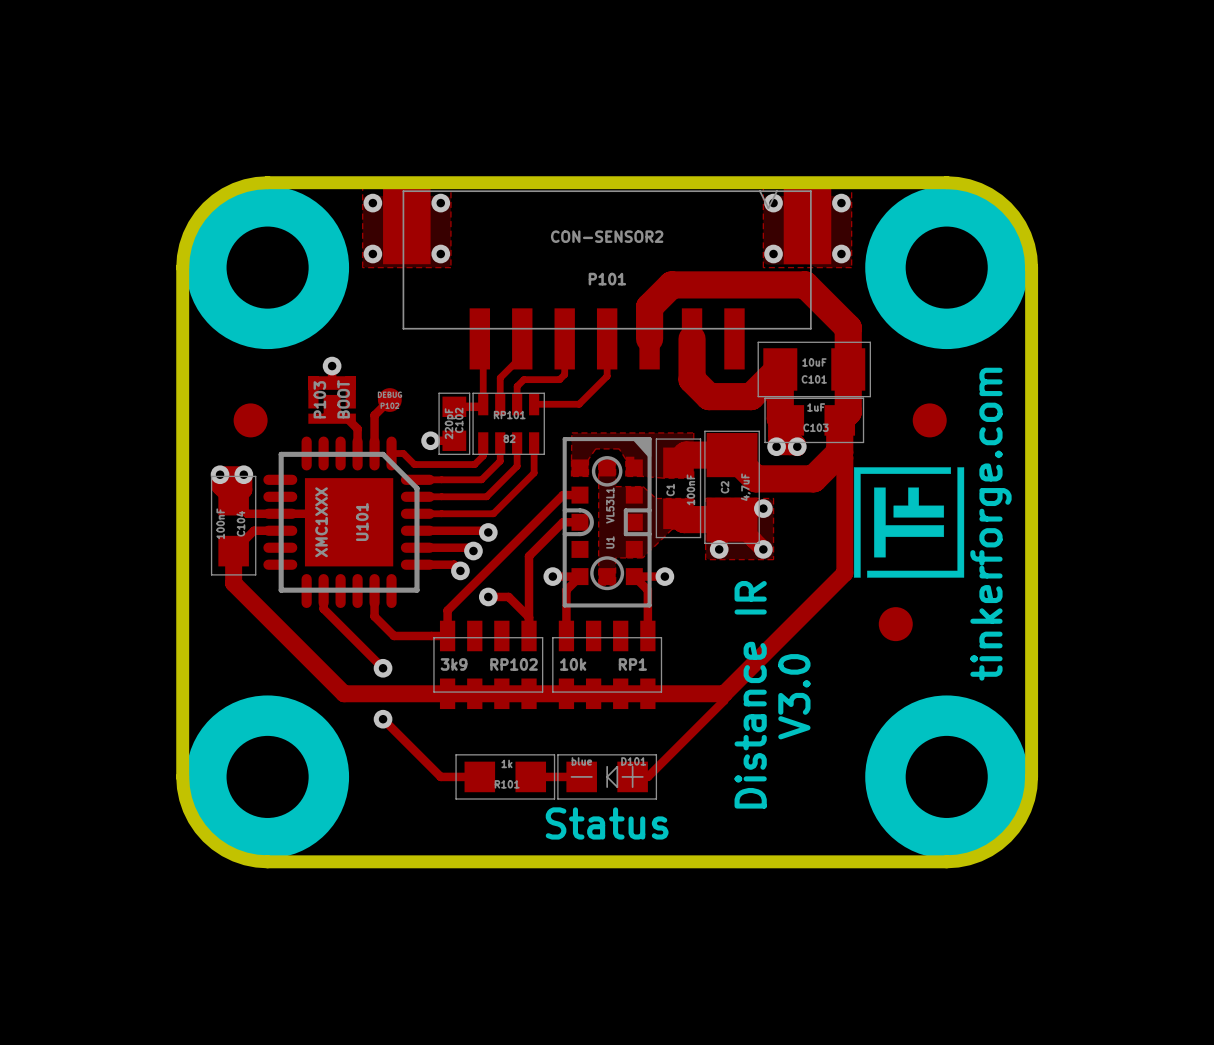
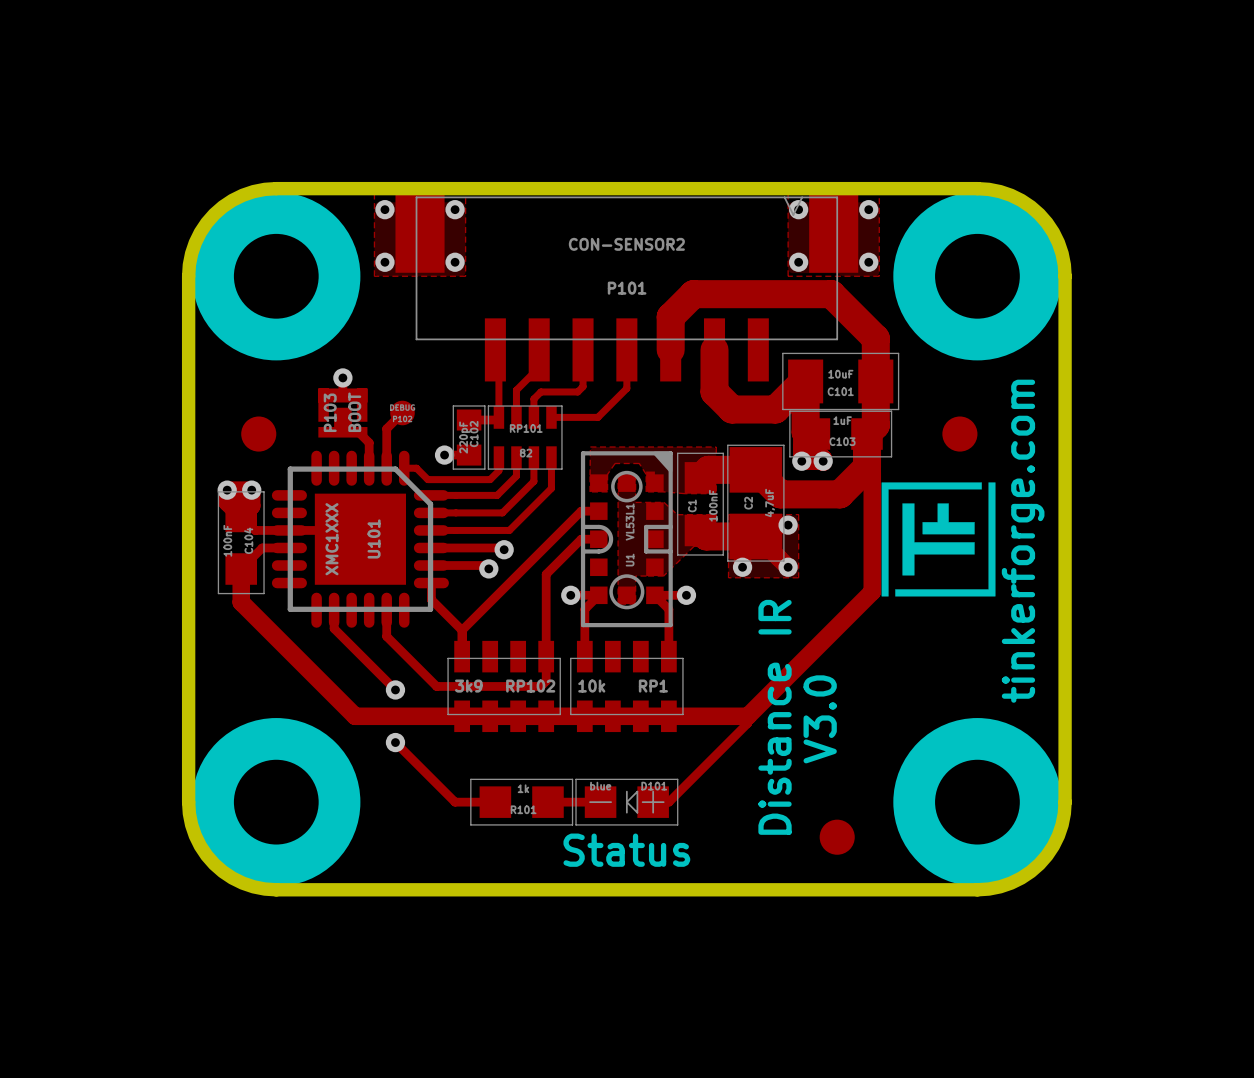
track: (417, 564) (454, 564) (460, 570) -> (431, 583) (431, 599) (462, 630)
via: (460, 570) -> none
track: (488, 596) (508, 596) (529, 617) -> none
via: (488, 596) -> none
part position: (895, 624) -> (837, 837)
track: (394, 635) (447, 635) -> (406, 656) (436, 686) (540, 686) (546, 681) (546, 656)

